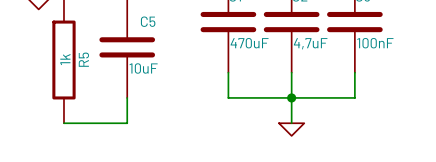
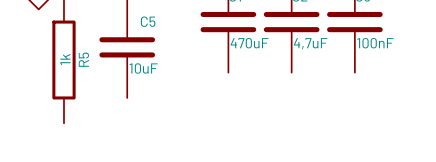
wire: (228, 72) (228, 97) (354, 97) (354, 72) -> none
wire: (291, 72) (291, 123) -> none
wire: (127, 97) (127, 123) (63, 123) -> none
junction: (291, 97) -> none
power symbol: (291, 129) -> none

